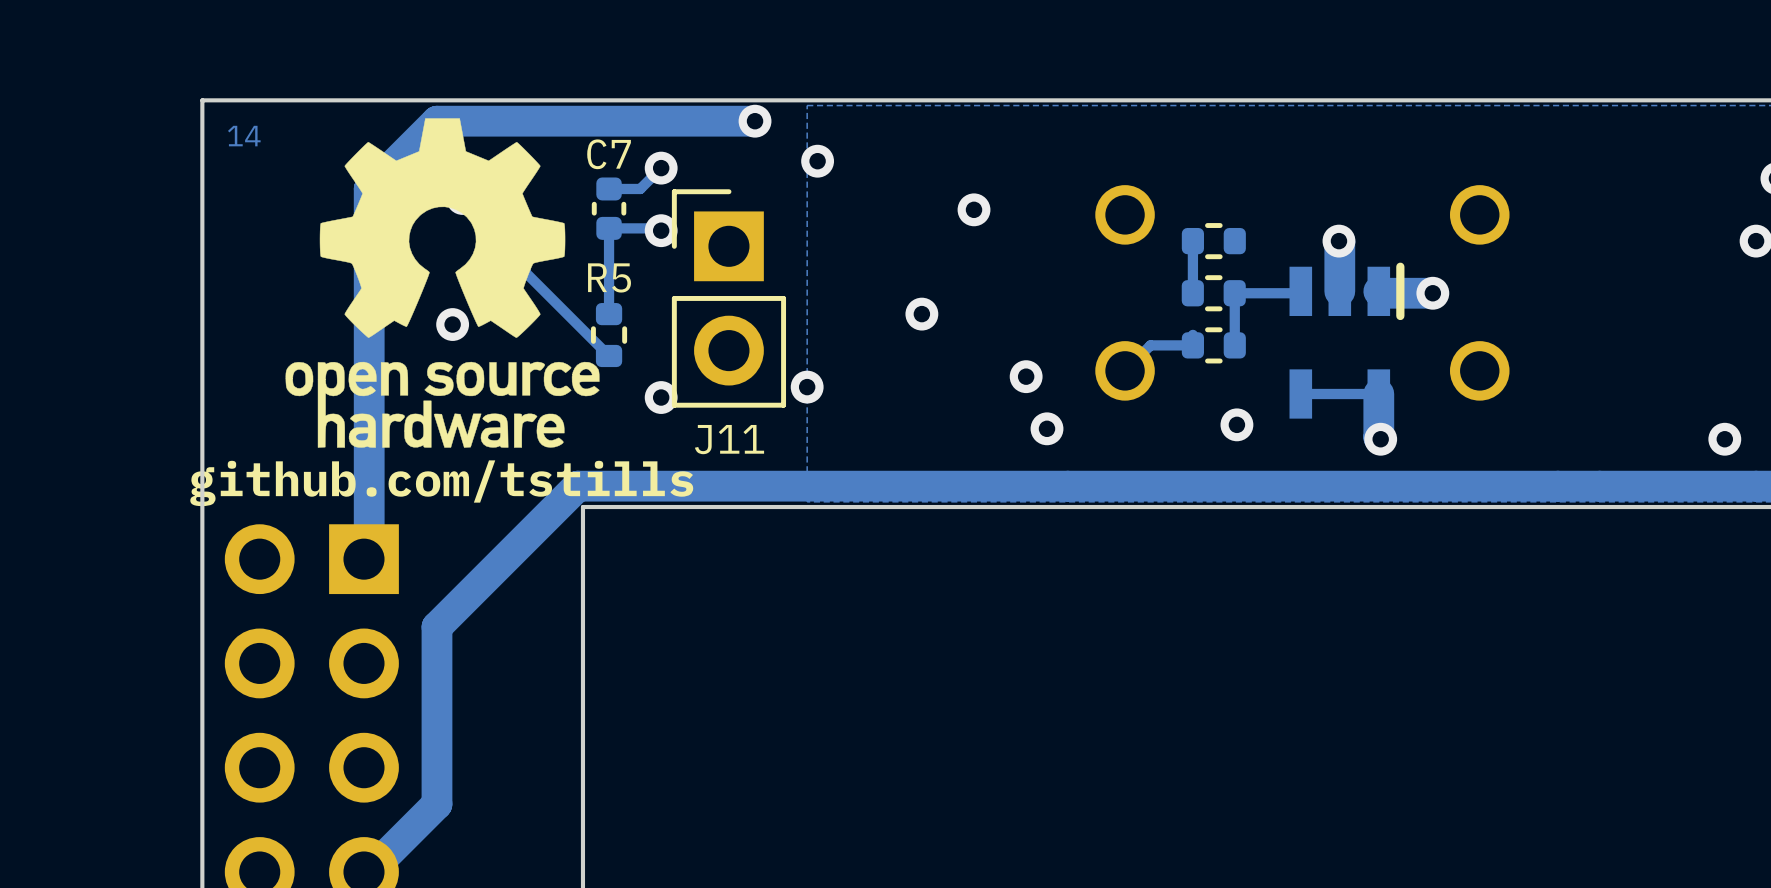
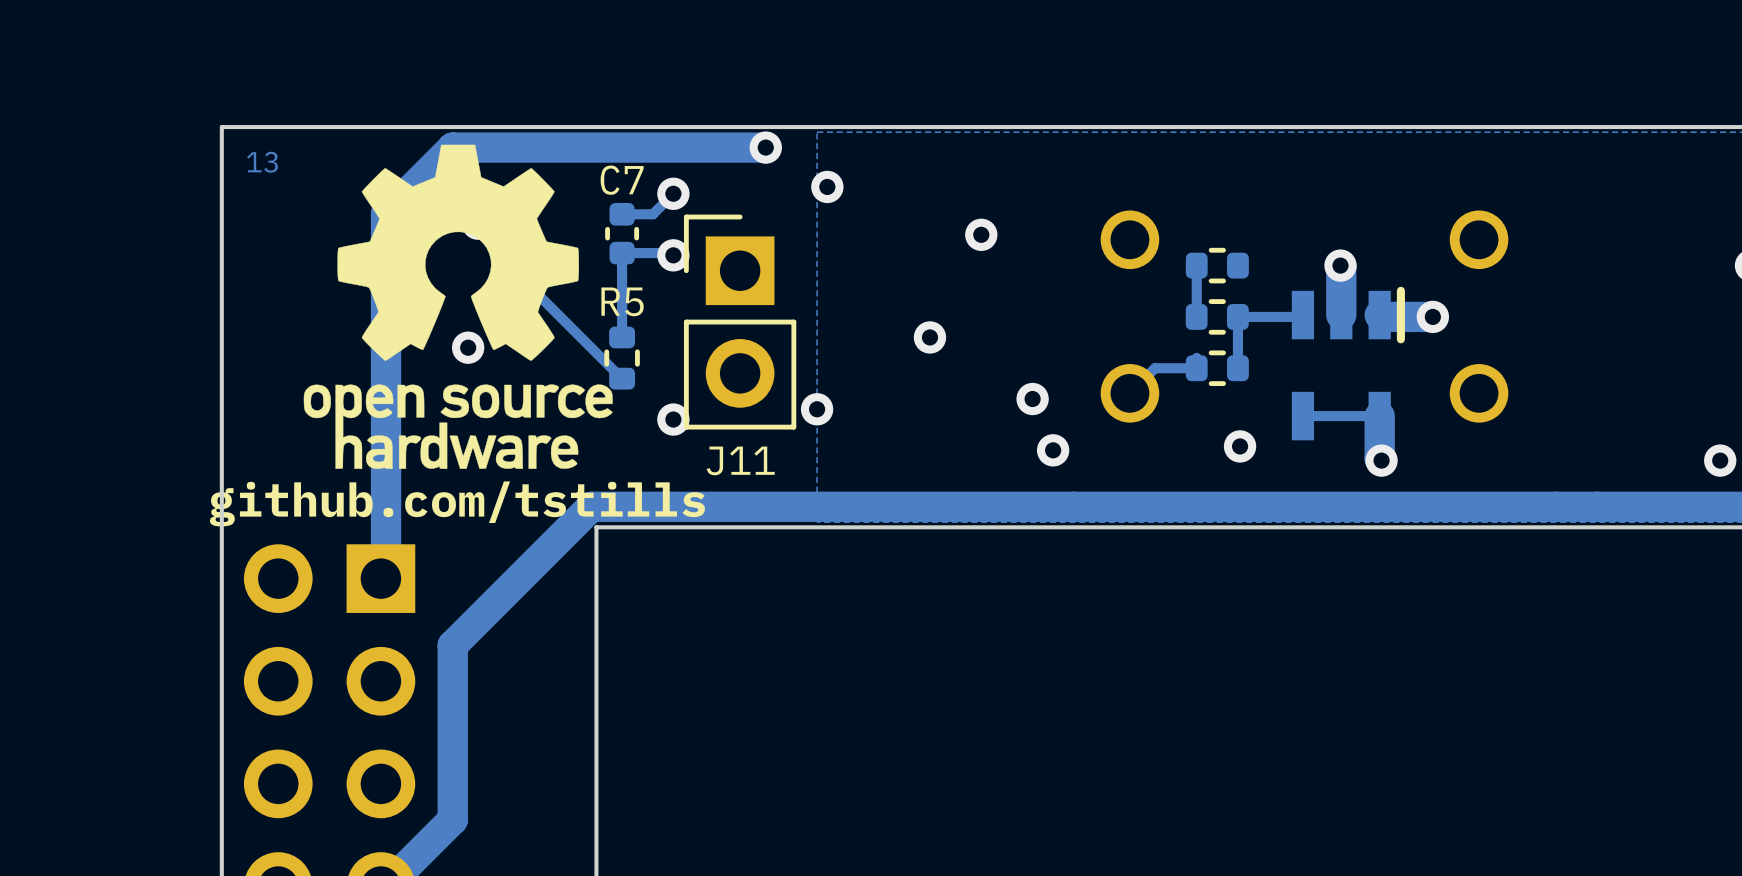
text: 14 (244, 136) -> 13 (262, 162)

